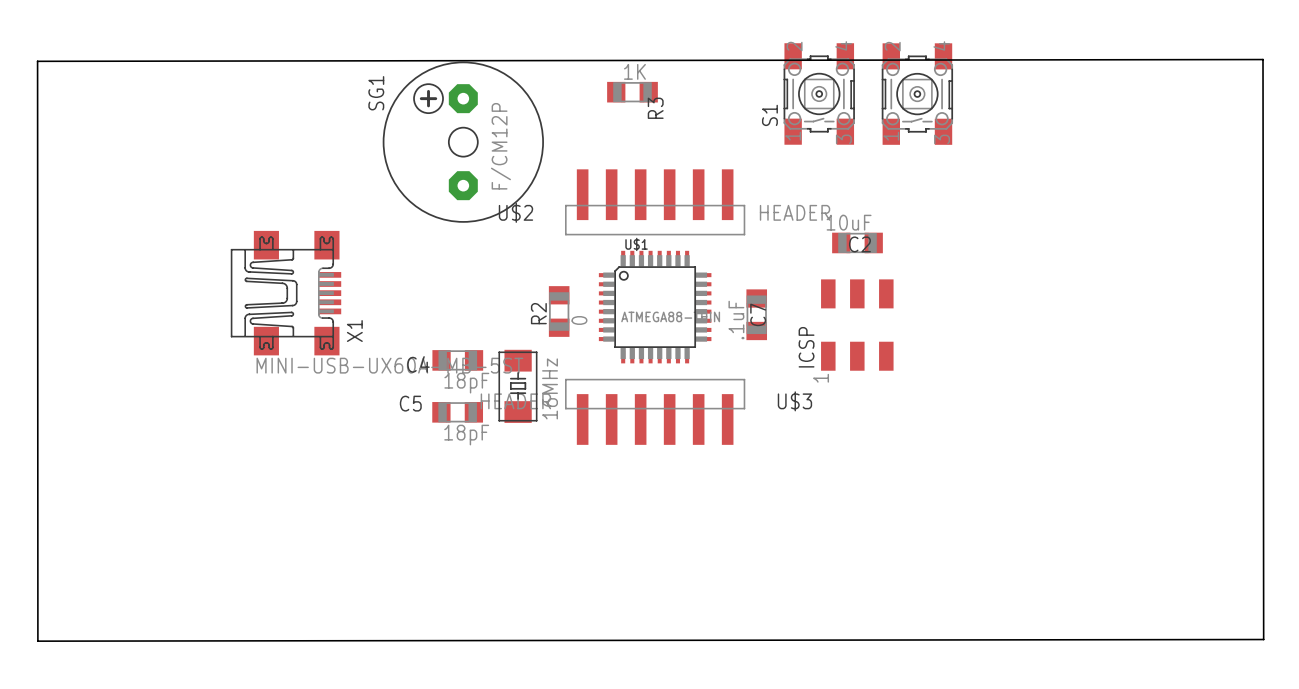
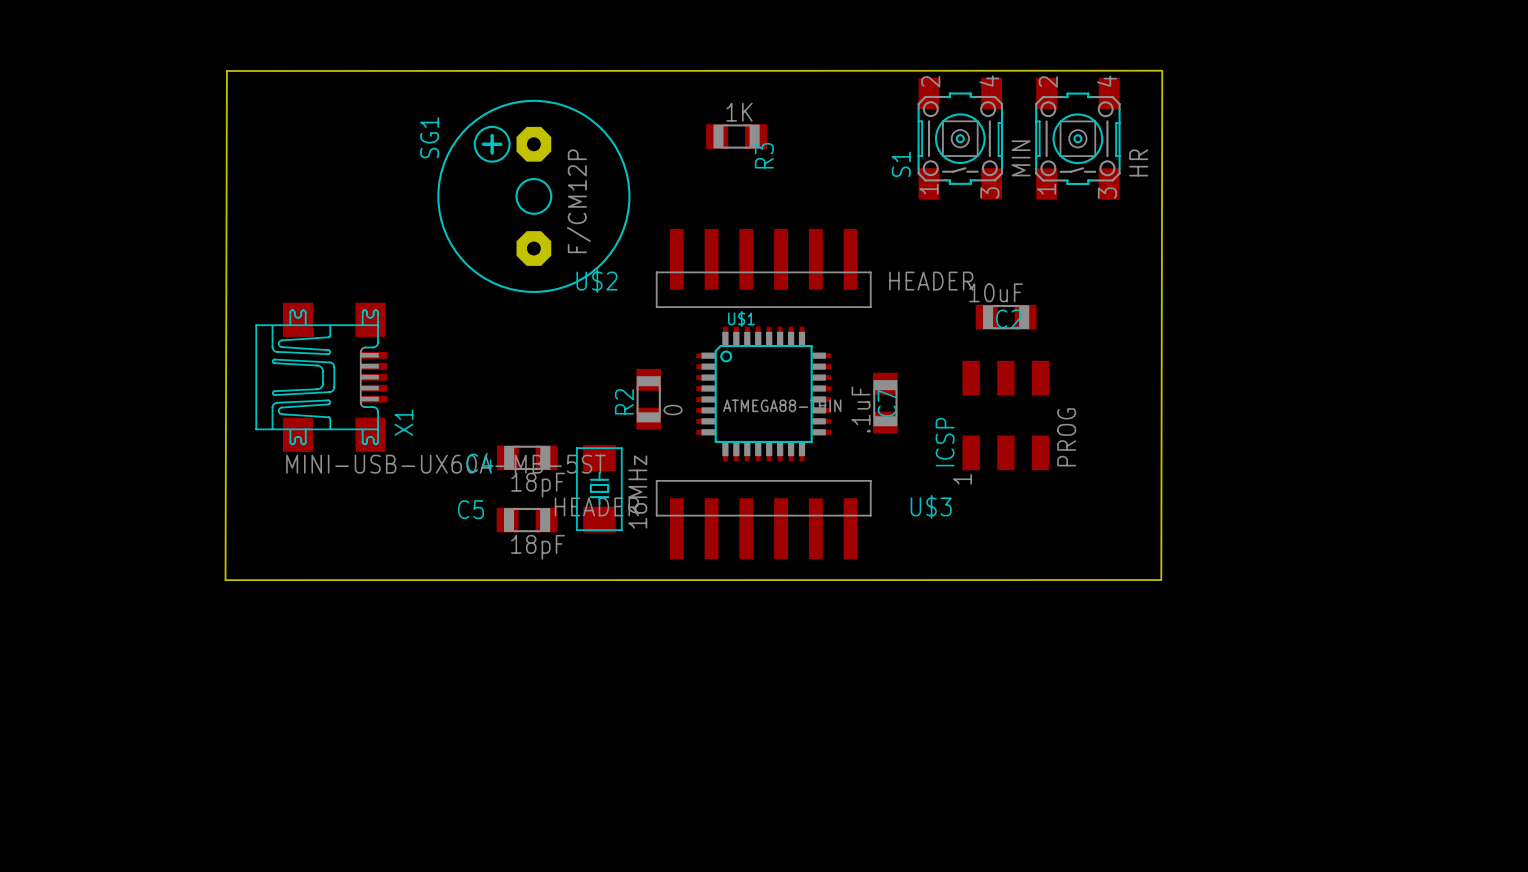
board edge: none -> (1162, 70) (1161, 580) (225, 580) (226, 71) (1162, 70)
board edge: (1263, 59) (1263, 639) (37, 641) (37, 61) (1263, 59) -> none
S1 value: none -> MIN (1021, 158)
part value: none -> HR (1138, 162)
ICSP value: none -> PROG (1066, 437)

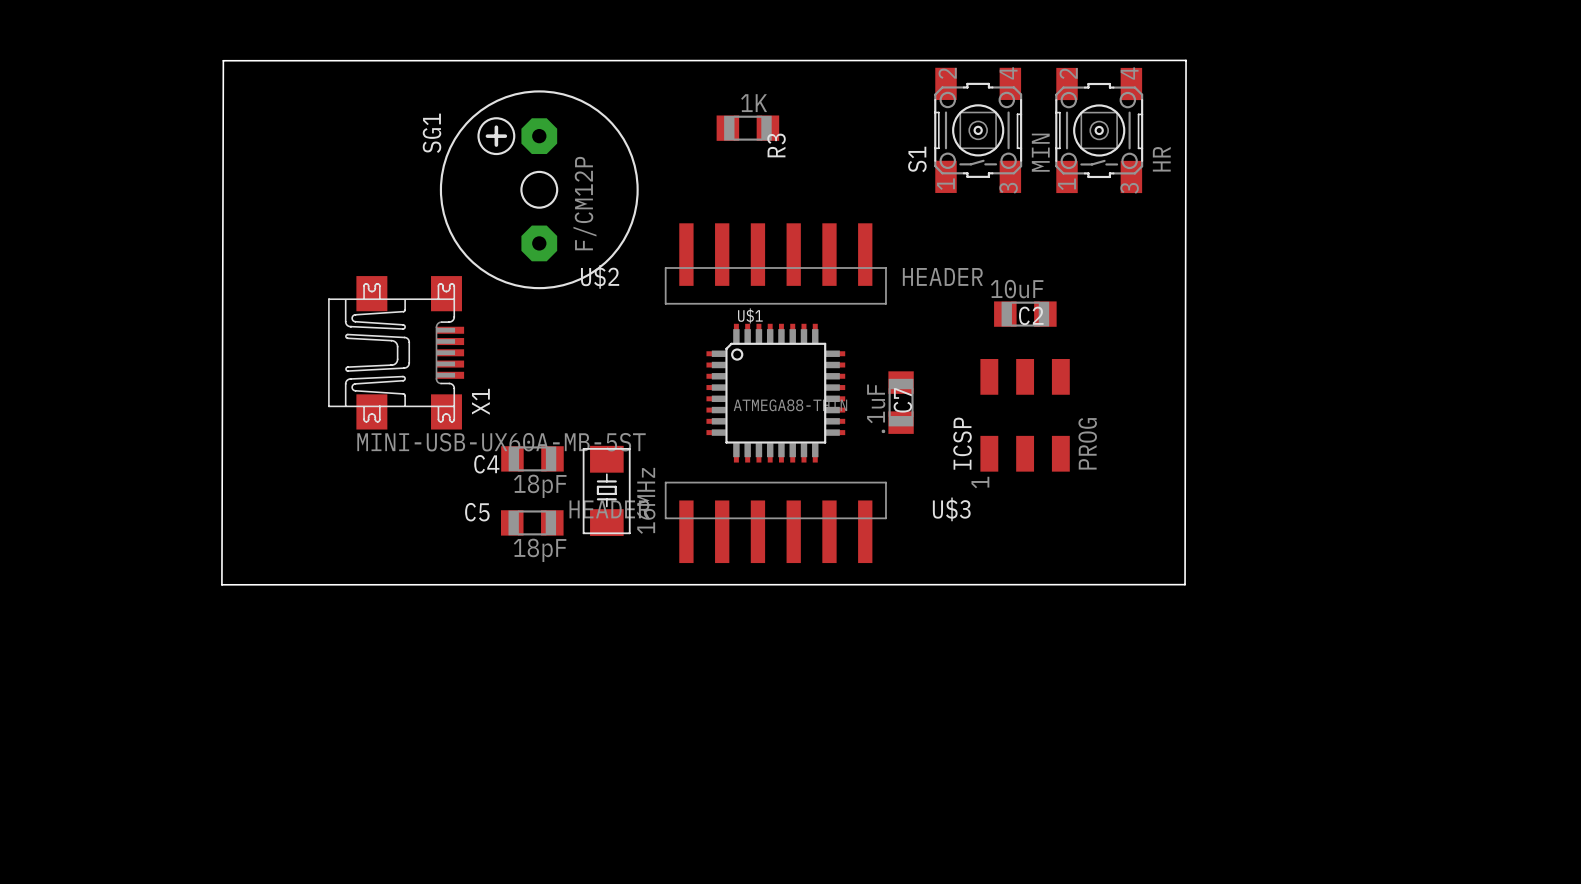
X1 position: (321, 377) -> (396, 352)
R2: 0 (648, 399) -> none

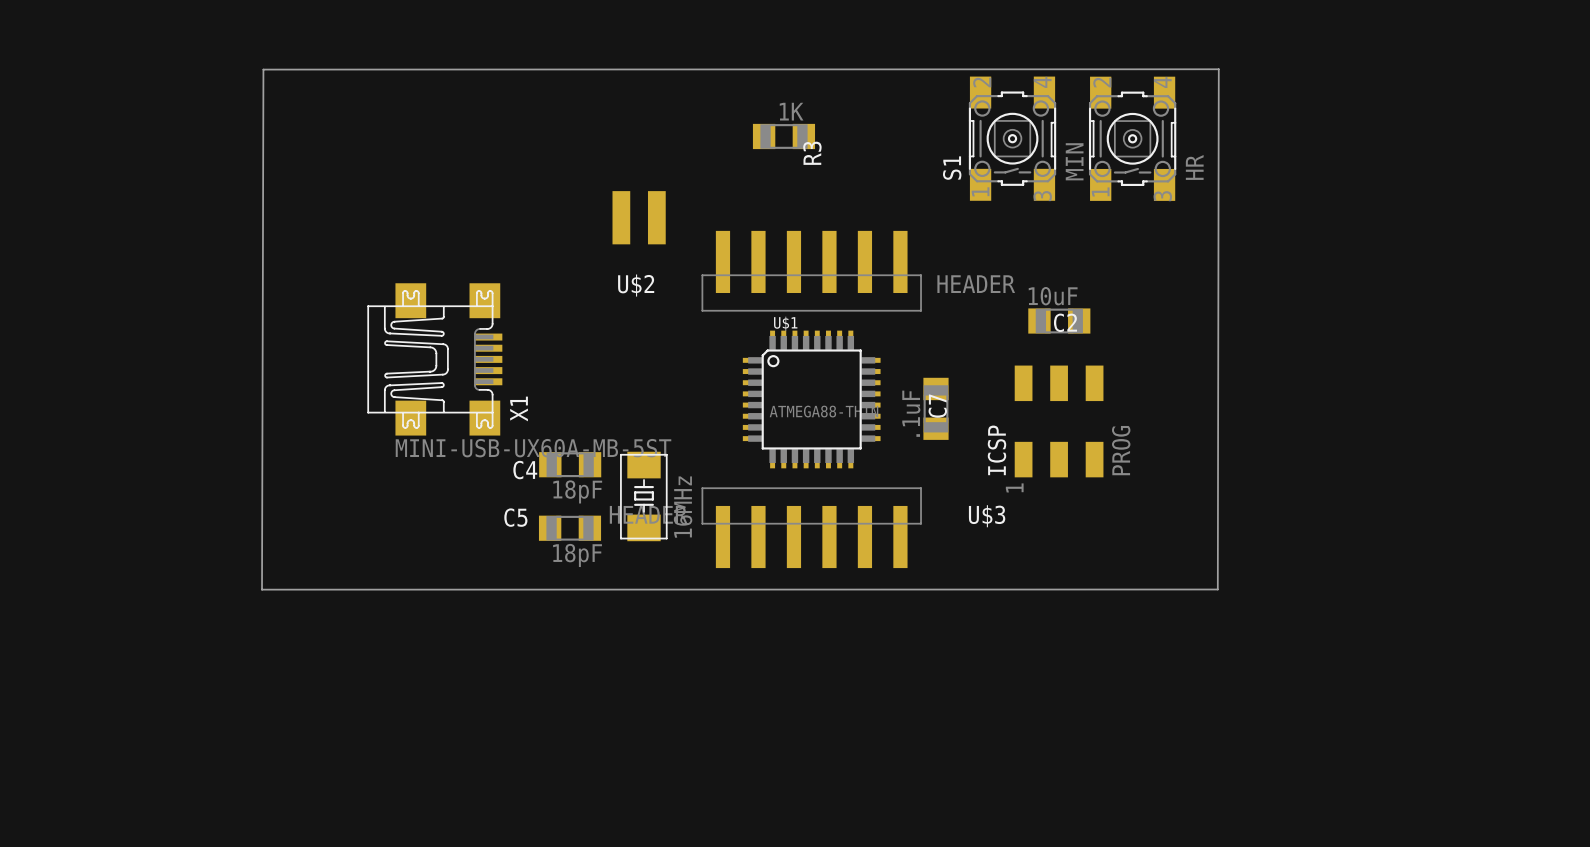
SG1: F/CM12P (539, 189) -> none
part: none -> (639, 217)

